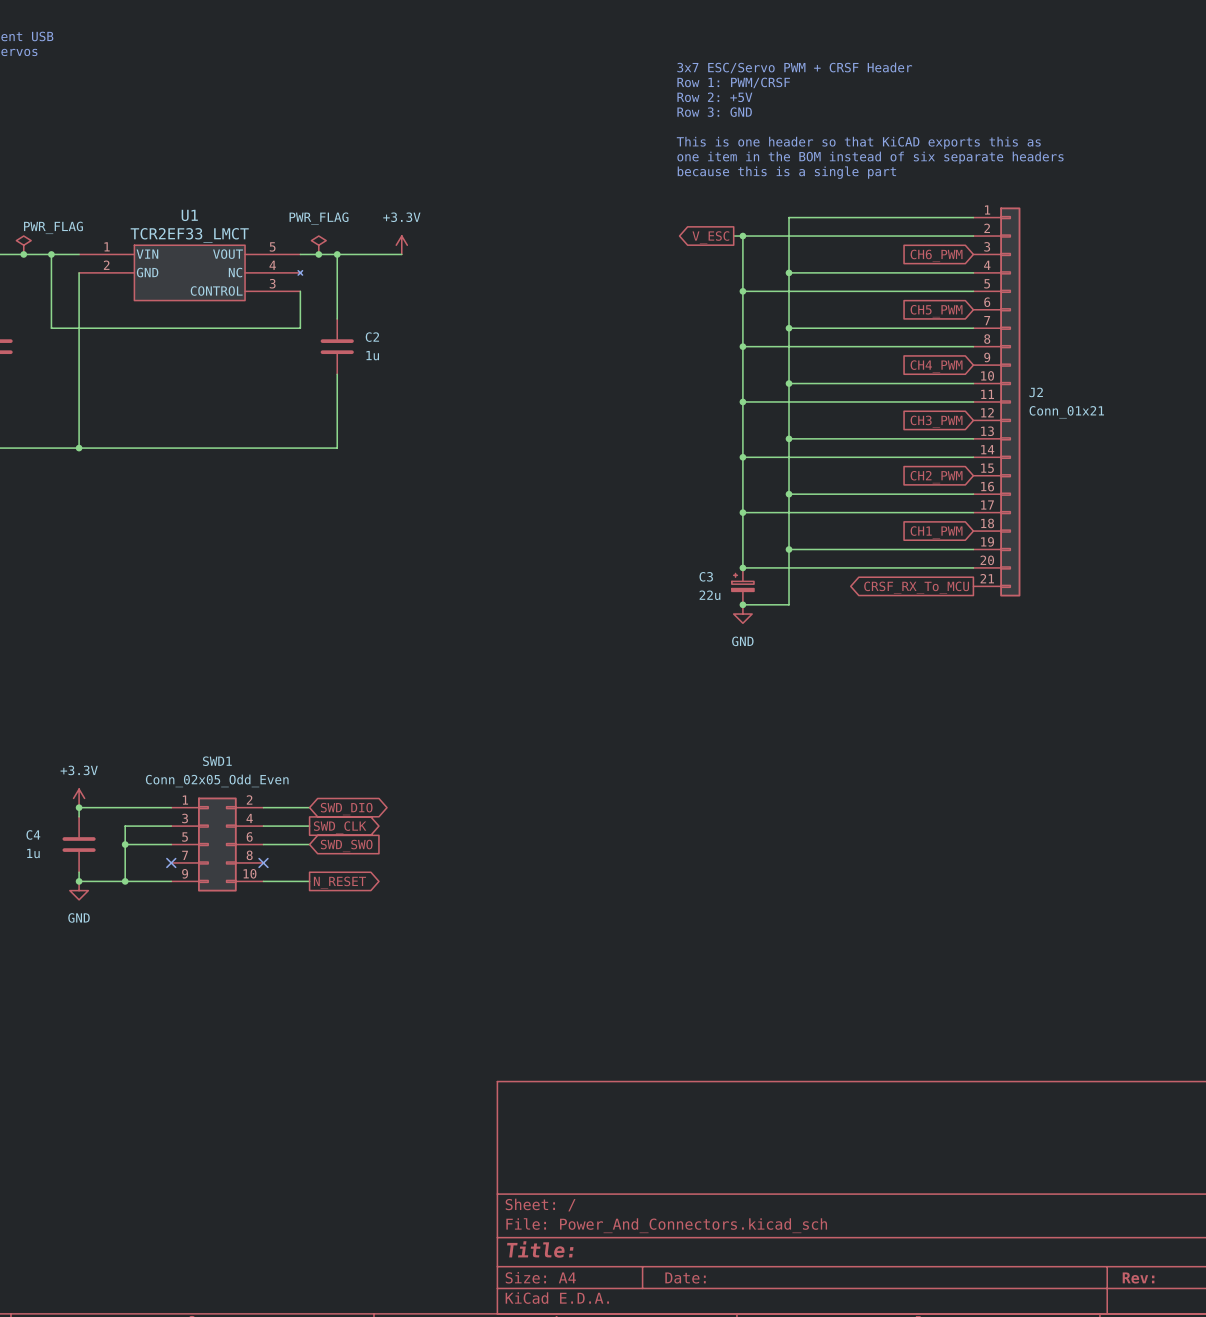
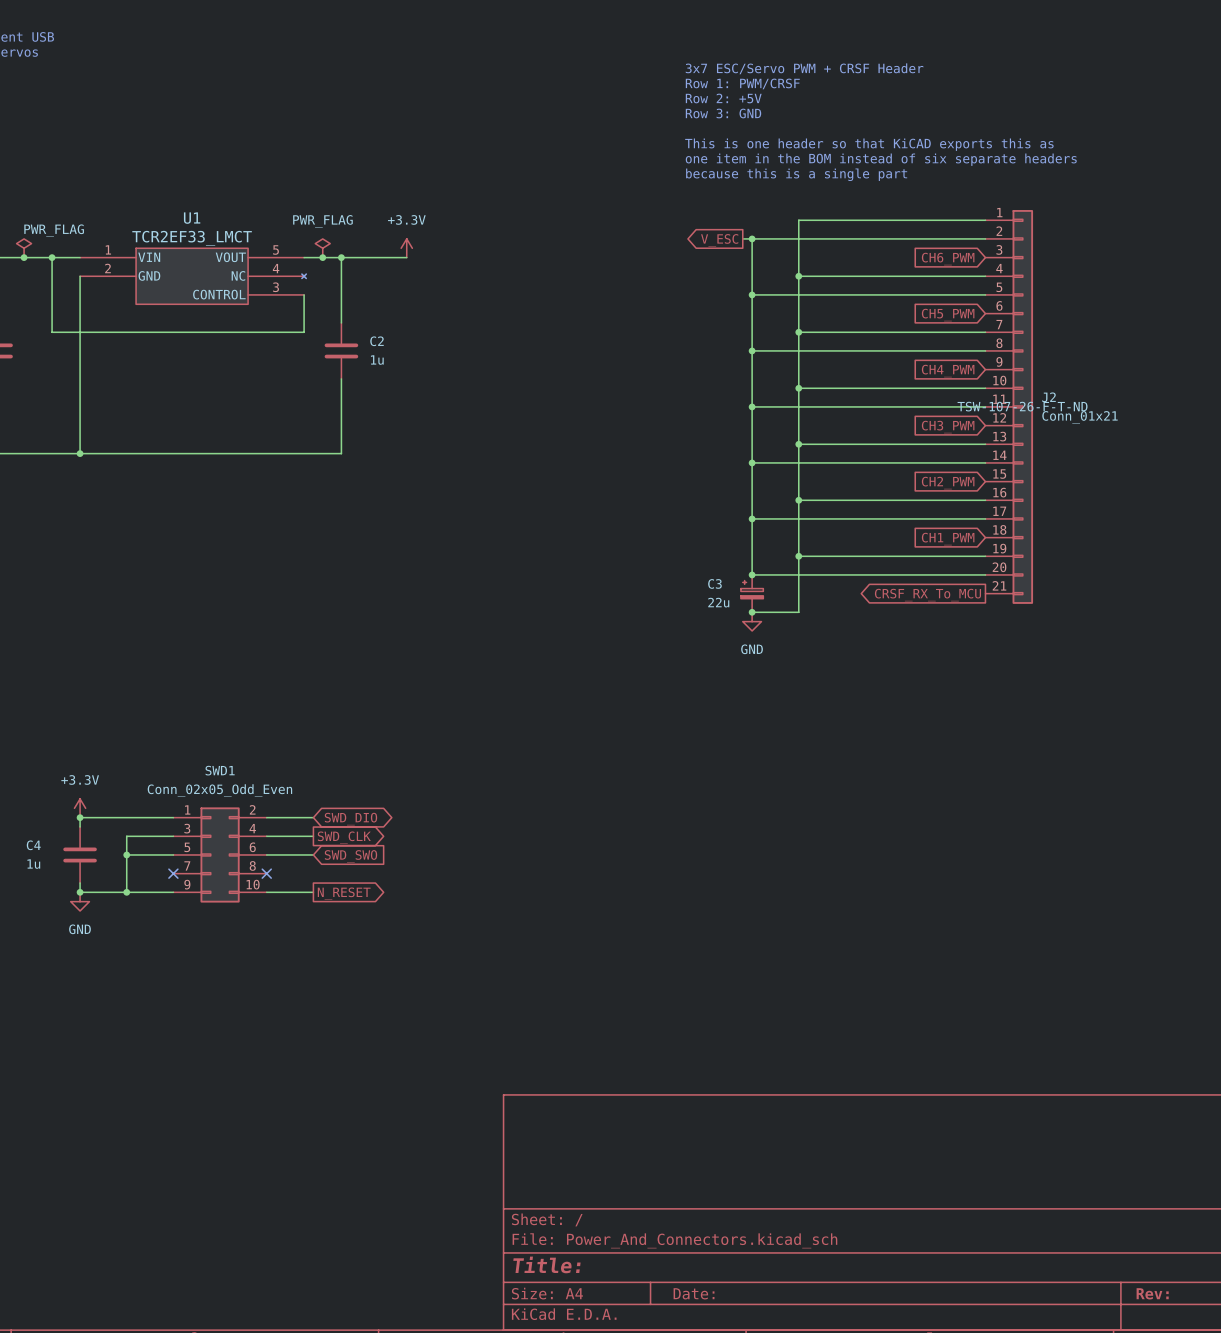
J2 text: none -> TSW-107-26-F-T-ND (1022, 406)

